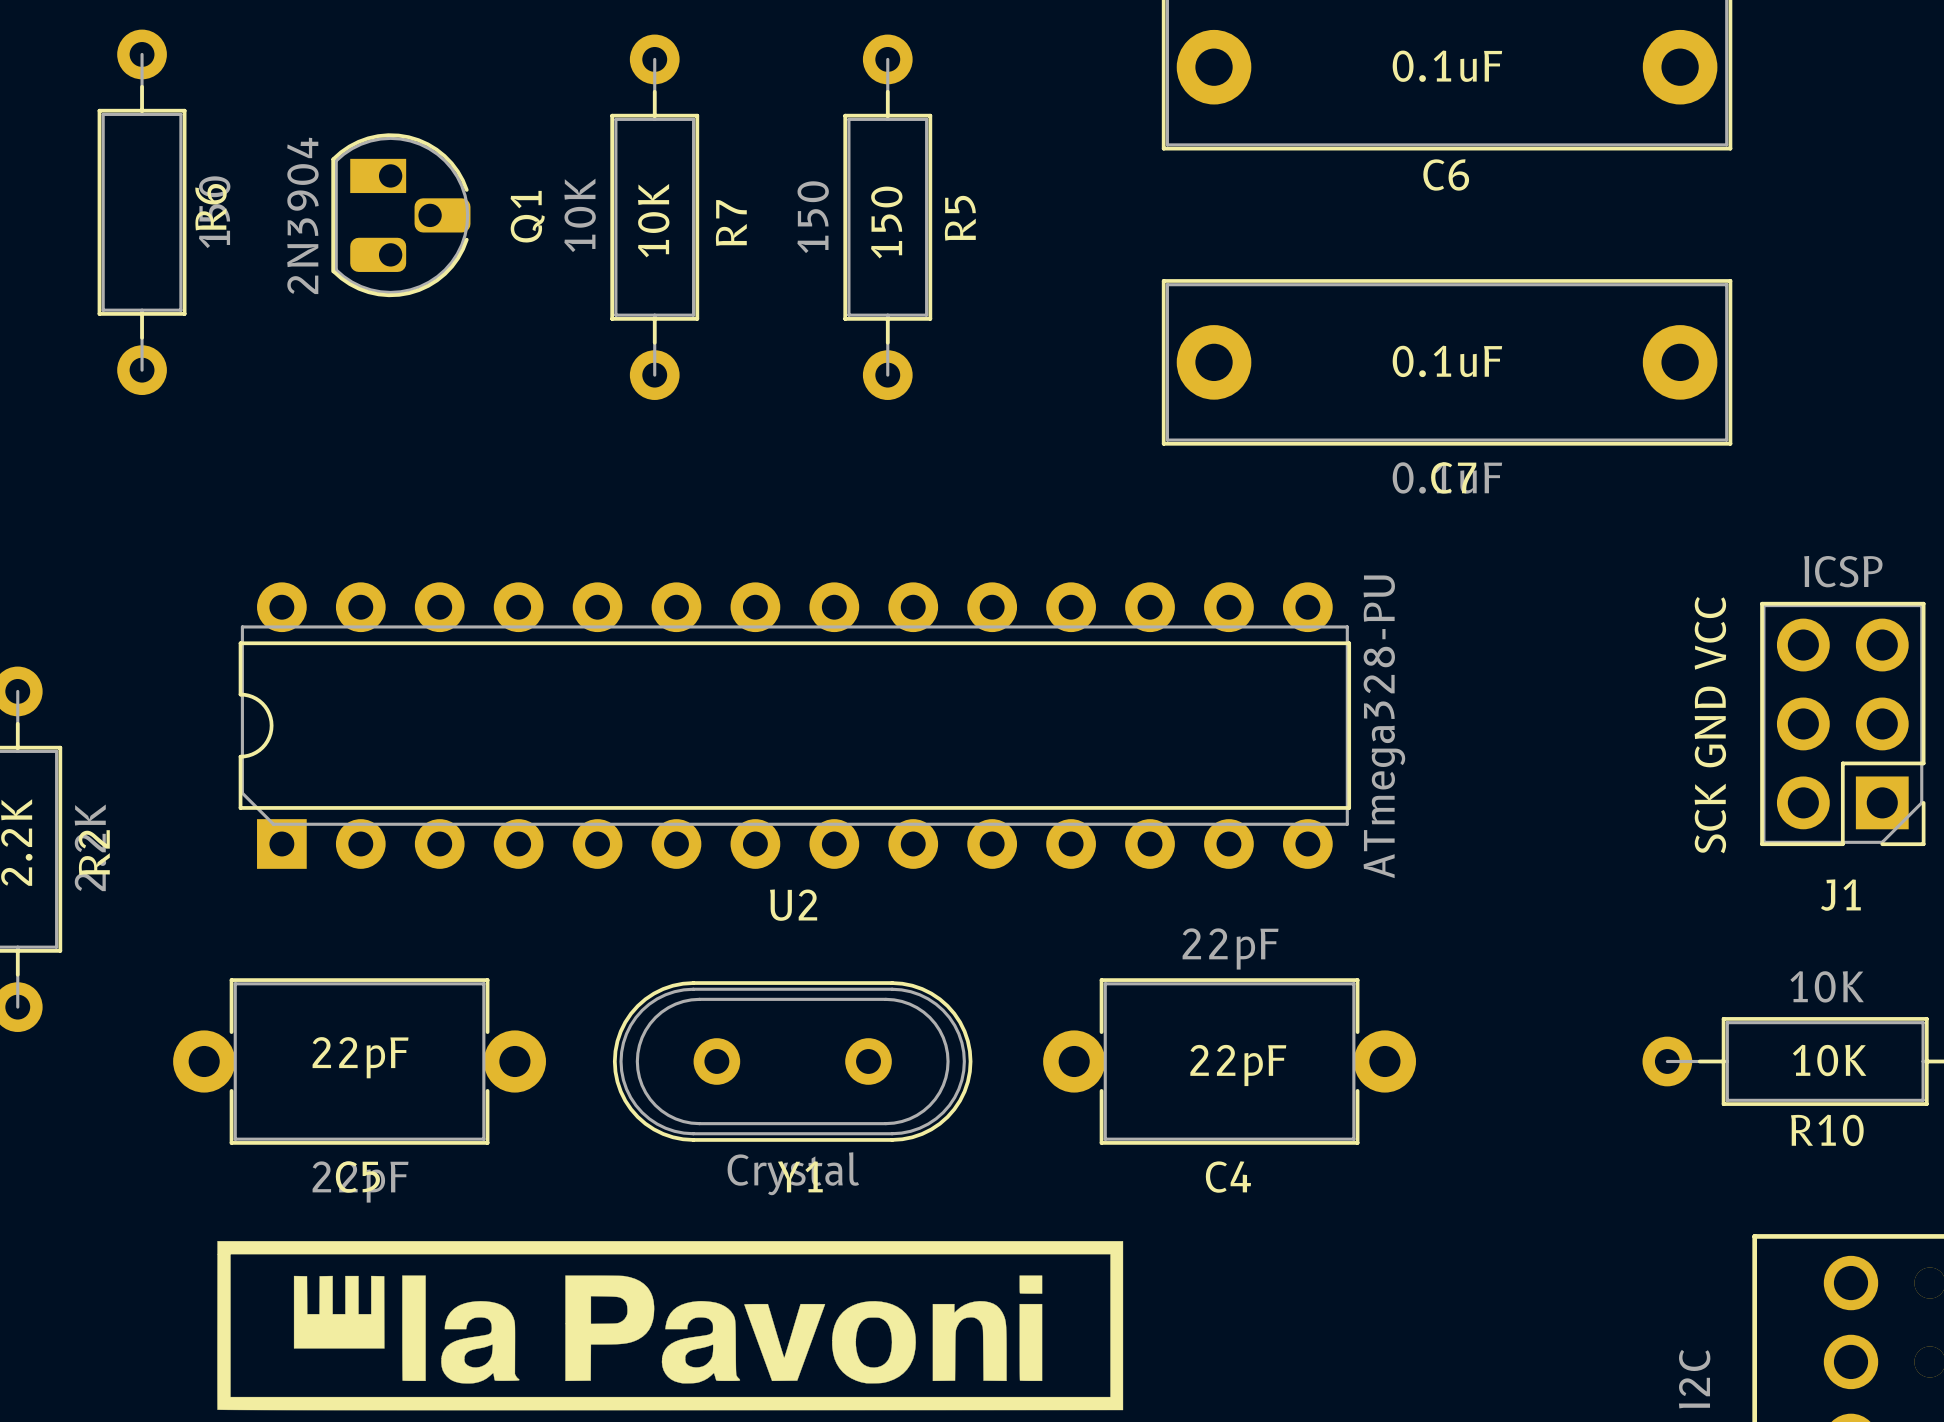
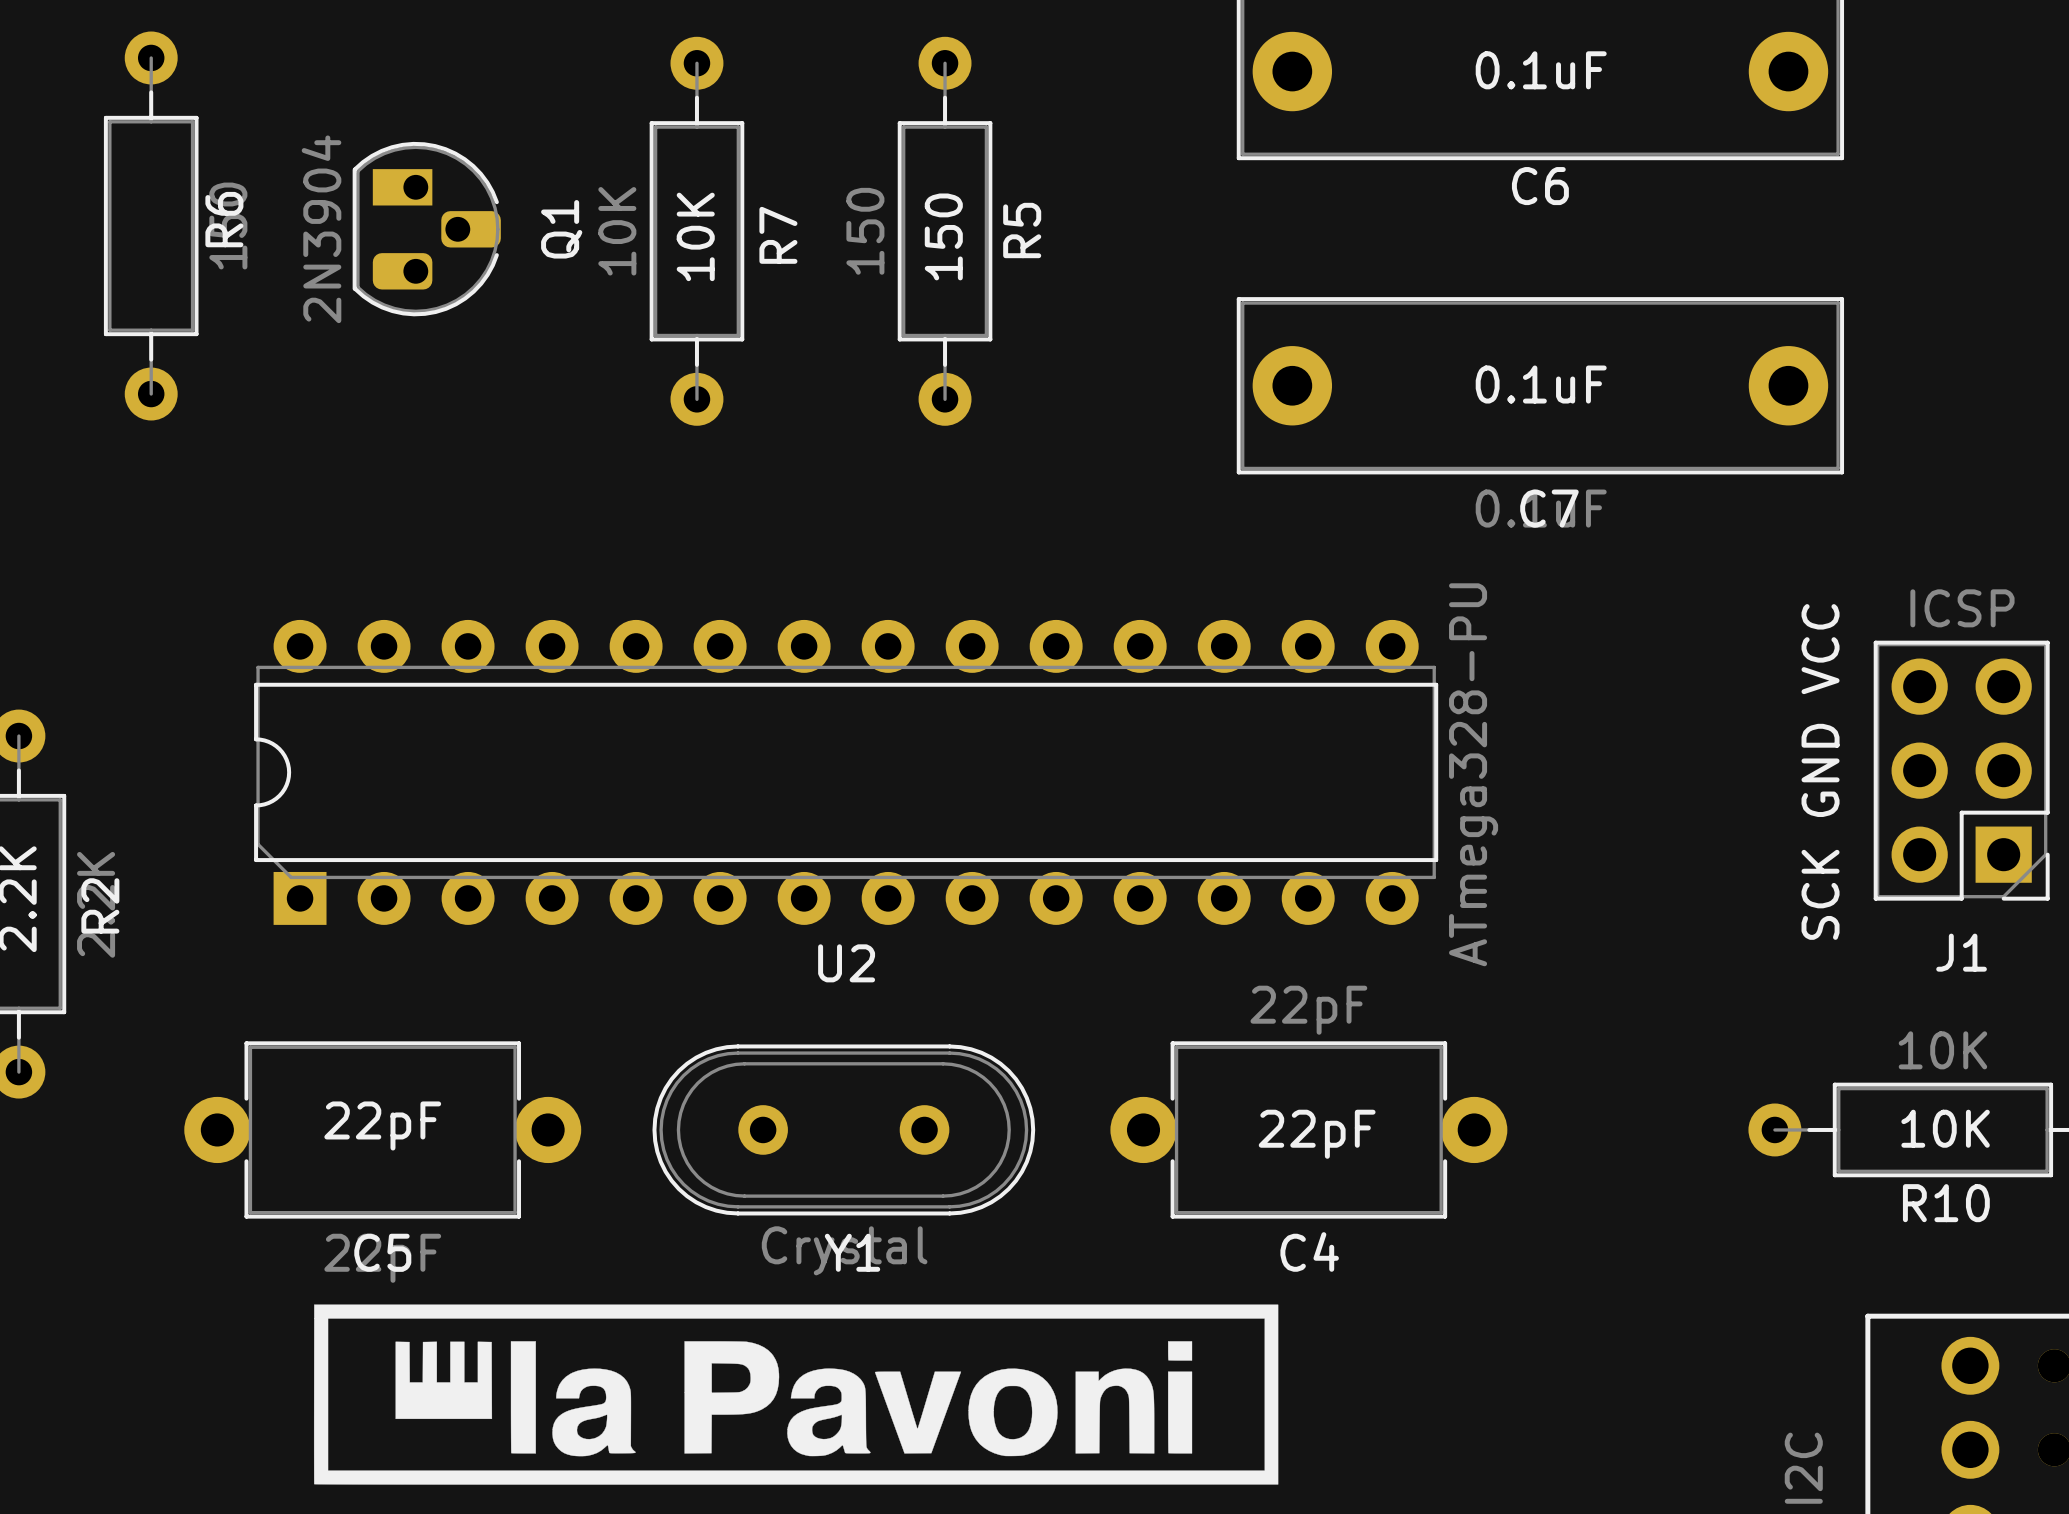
drawing position: (670, 1325) -> (796, 1394)

